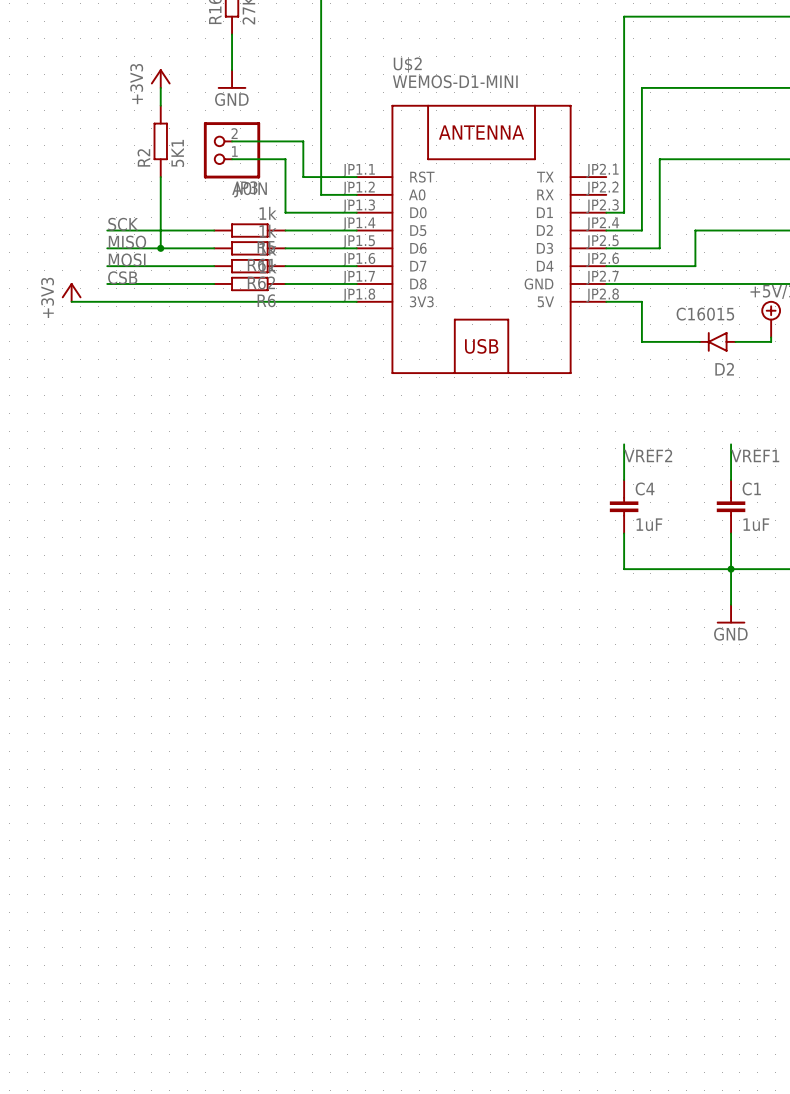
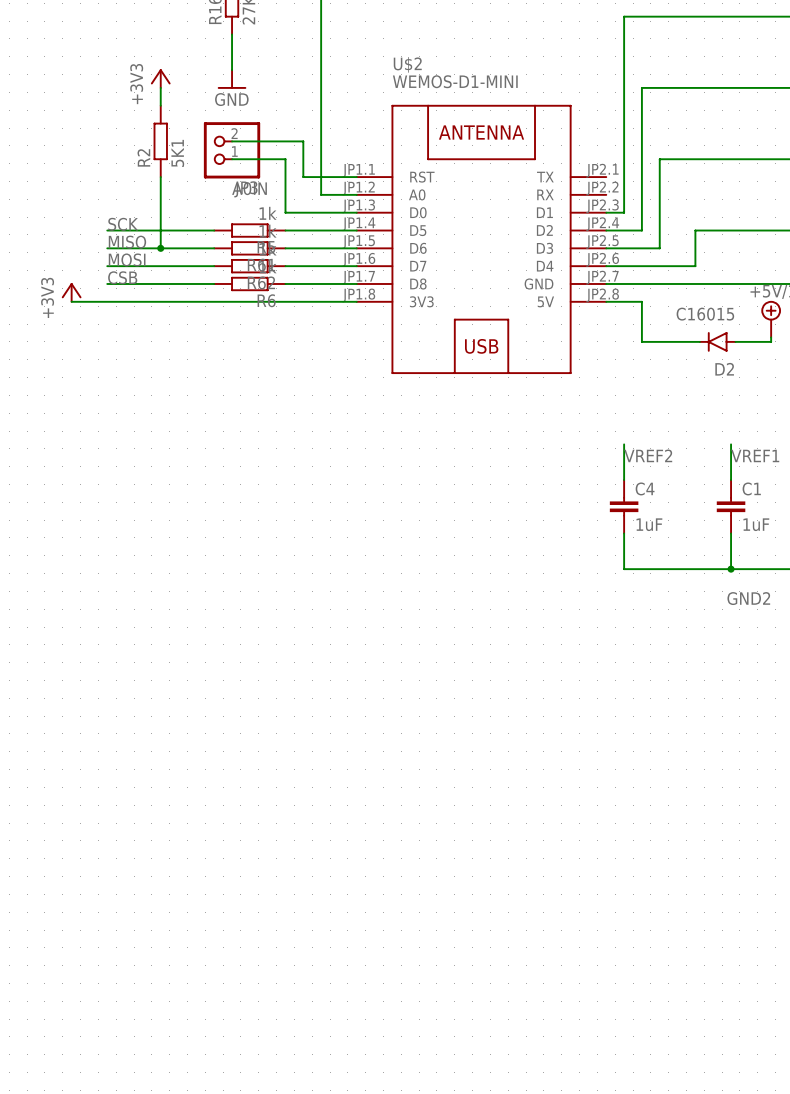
wire: (731, 569) (731, 604) -> none
label: none -> GND2 (748, 598)
power symbol: GND (731, 614) -> none

